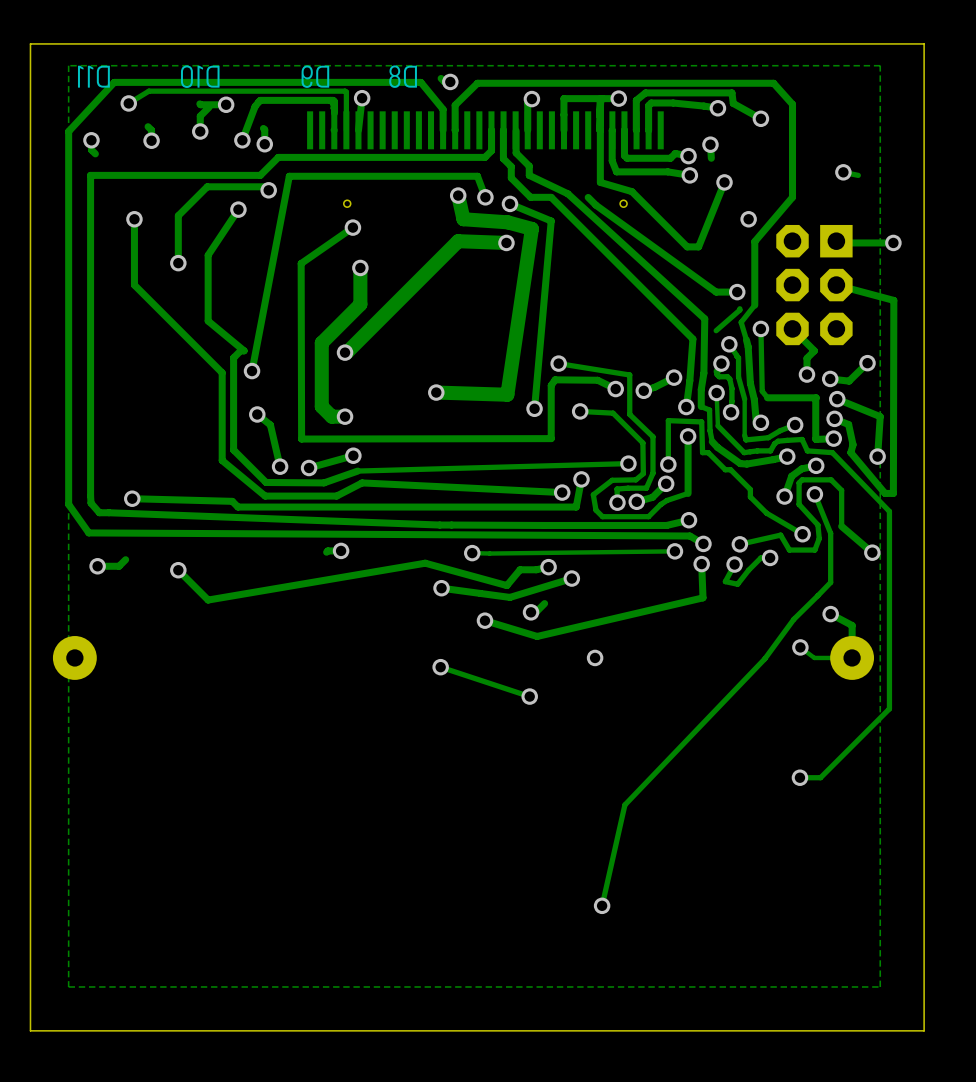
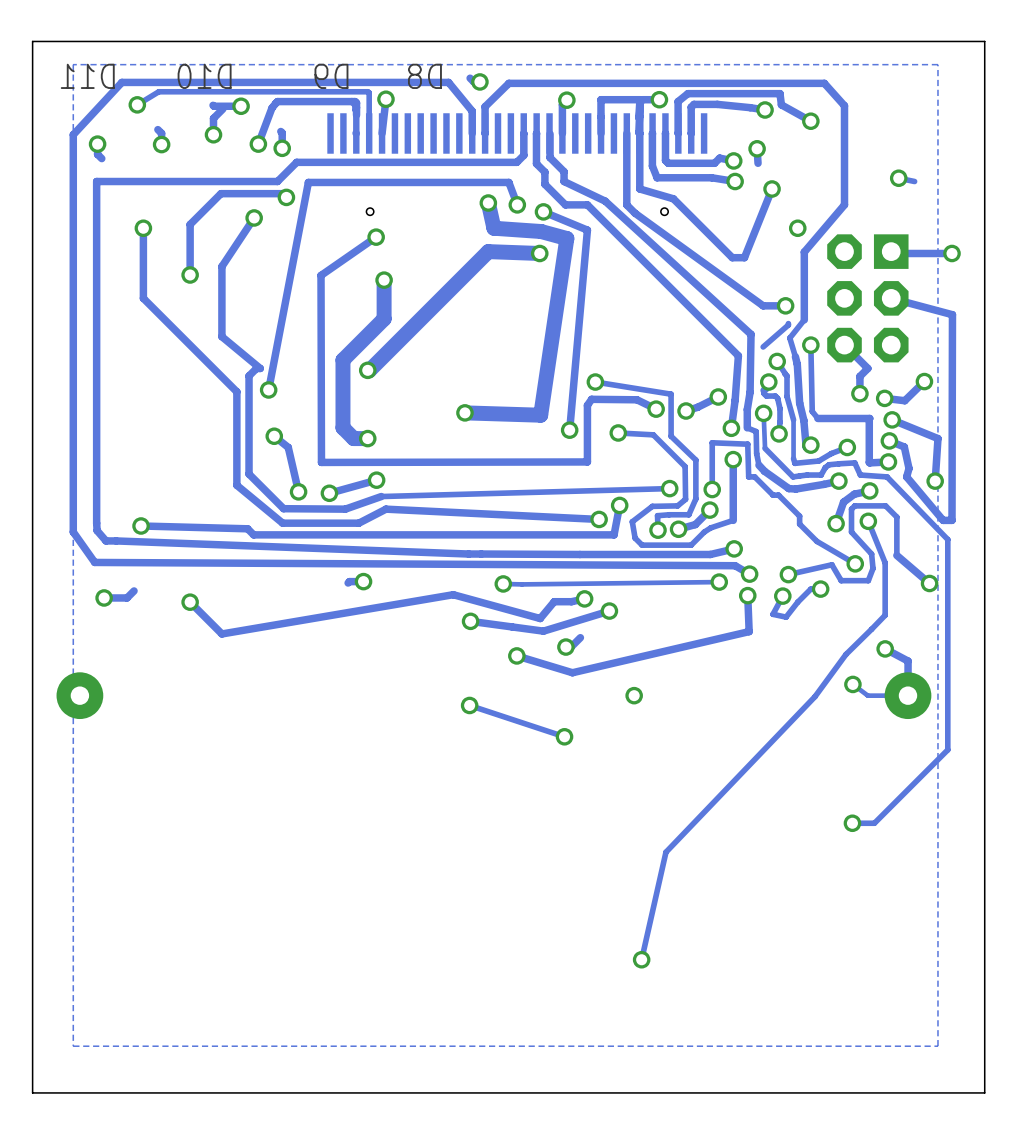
track: none -> (626, 133) (626, 205)

